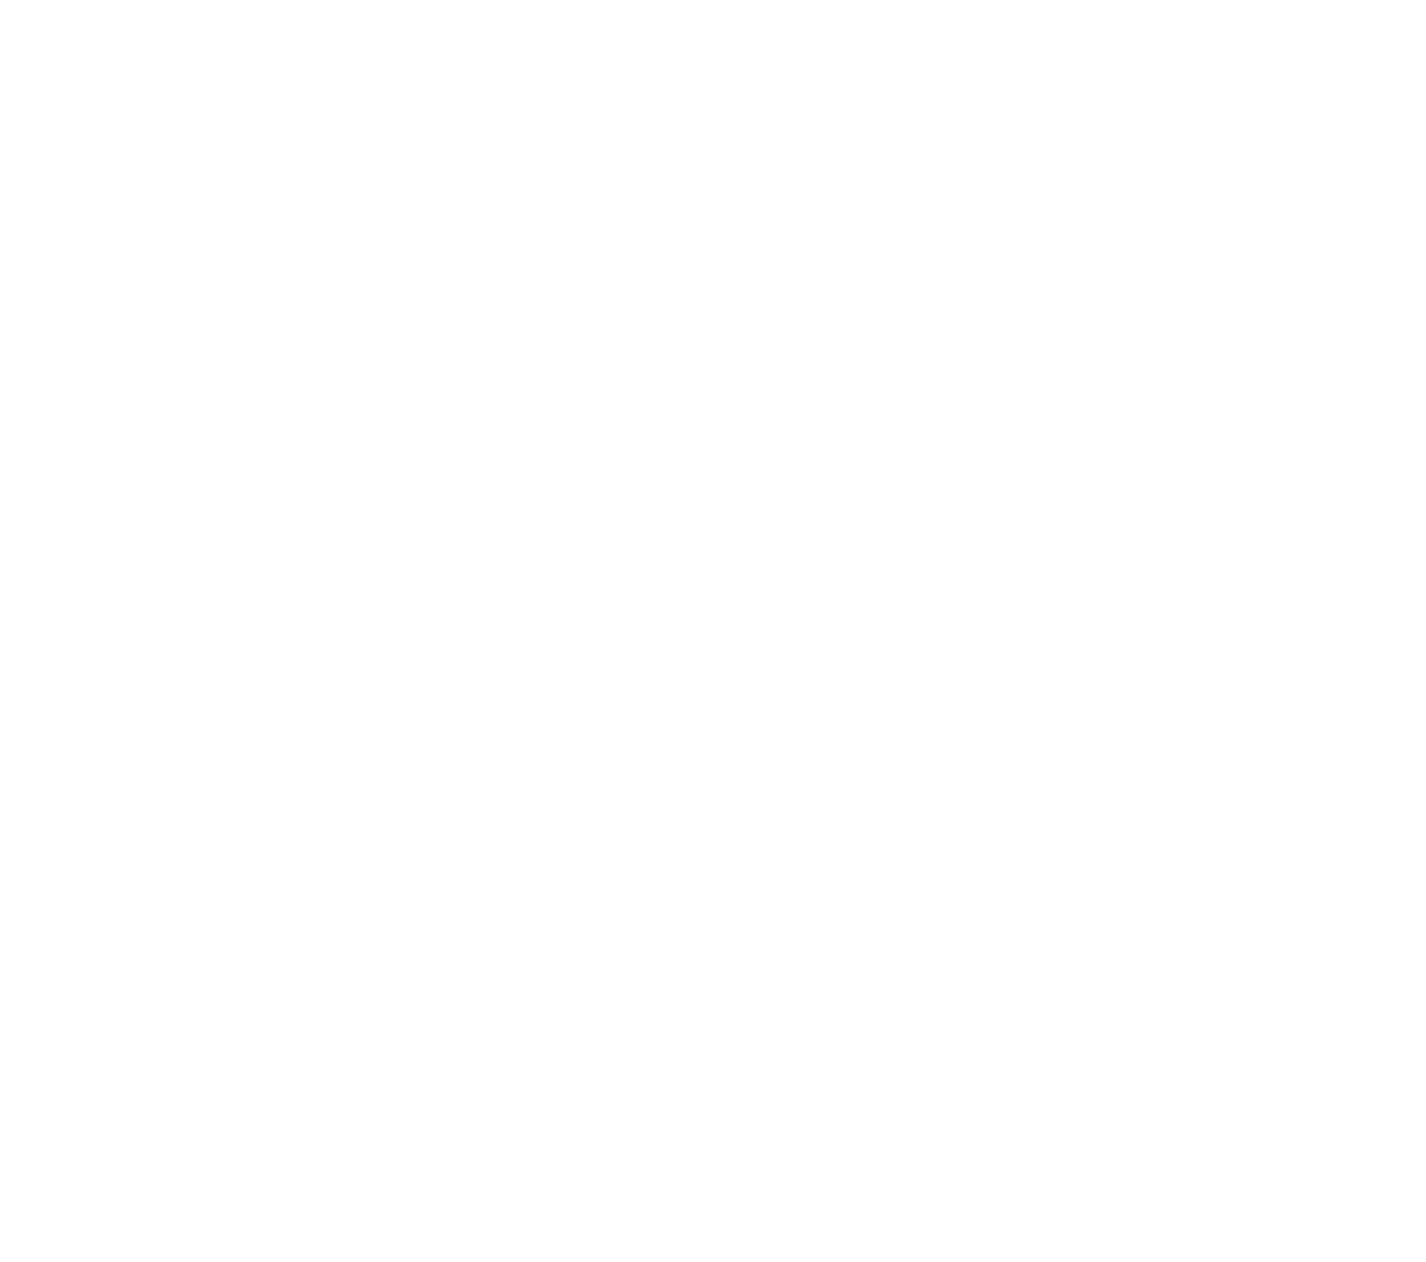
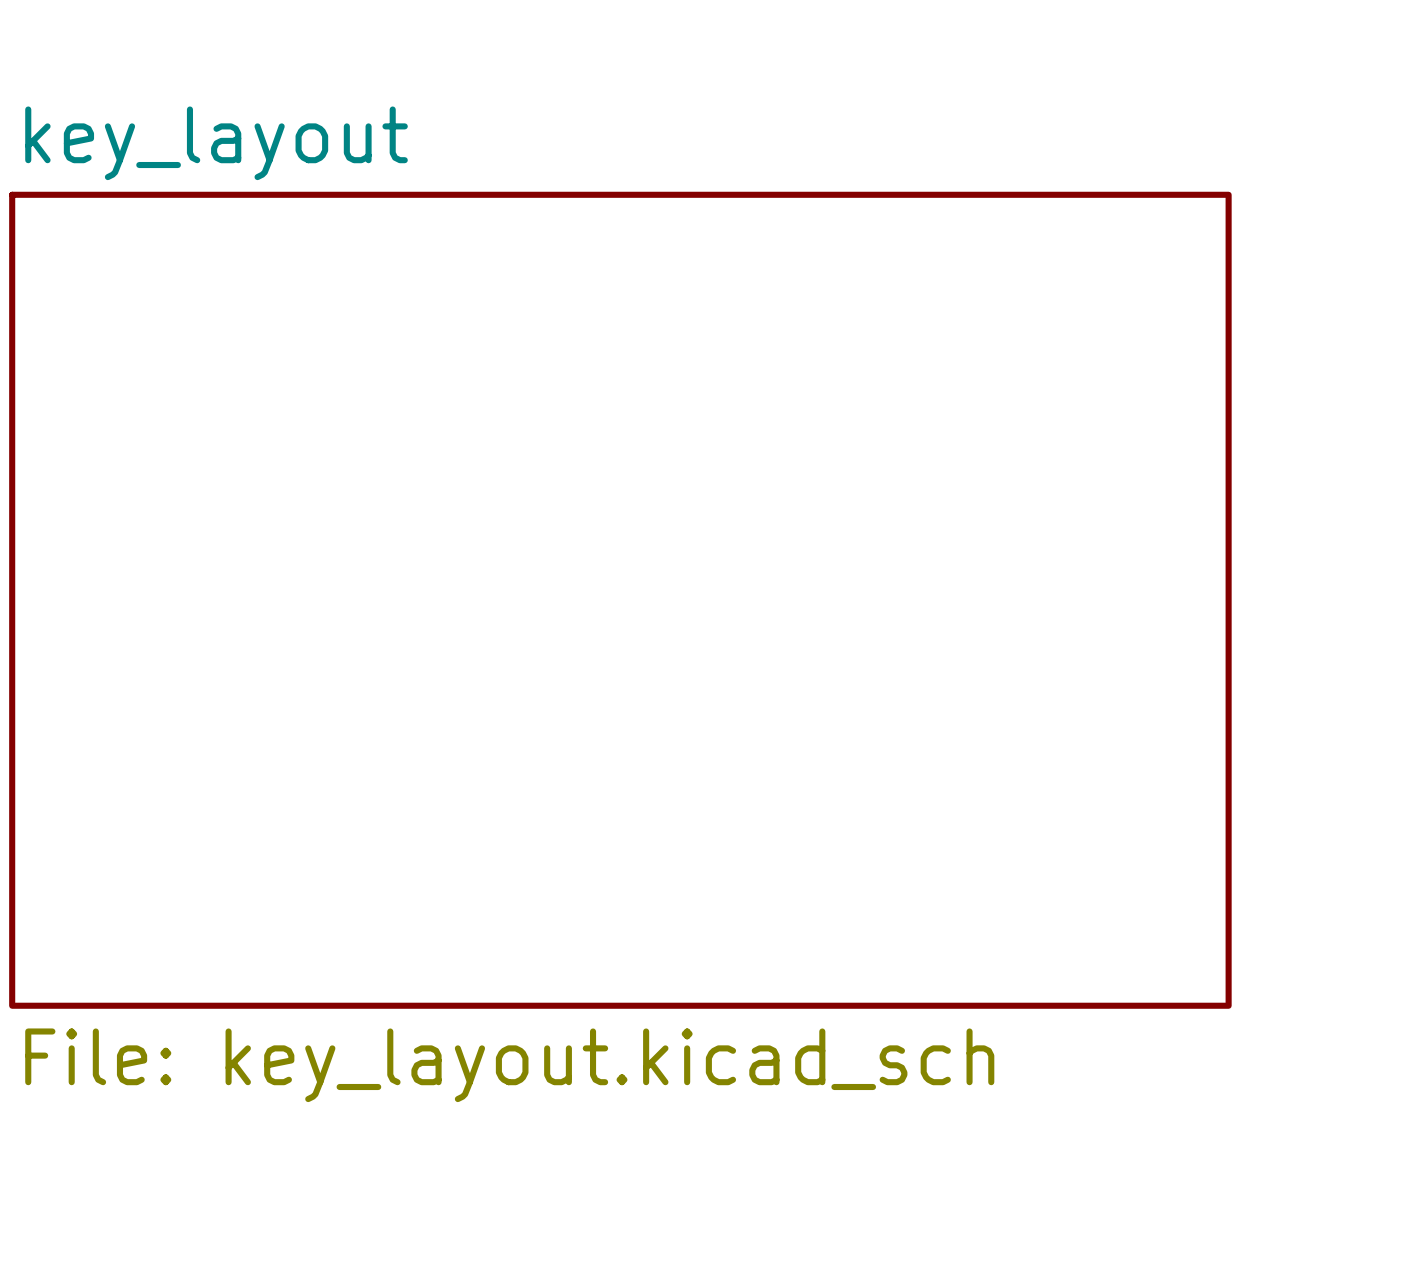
sheet key_layout: none -> File: key_layout.kicad_sch (620, 600)

